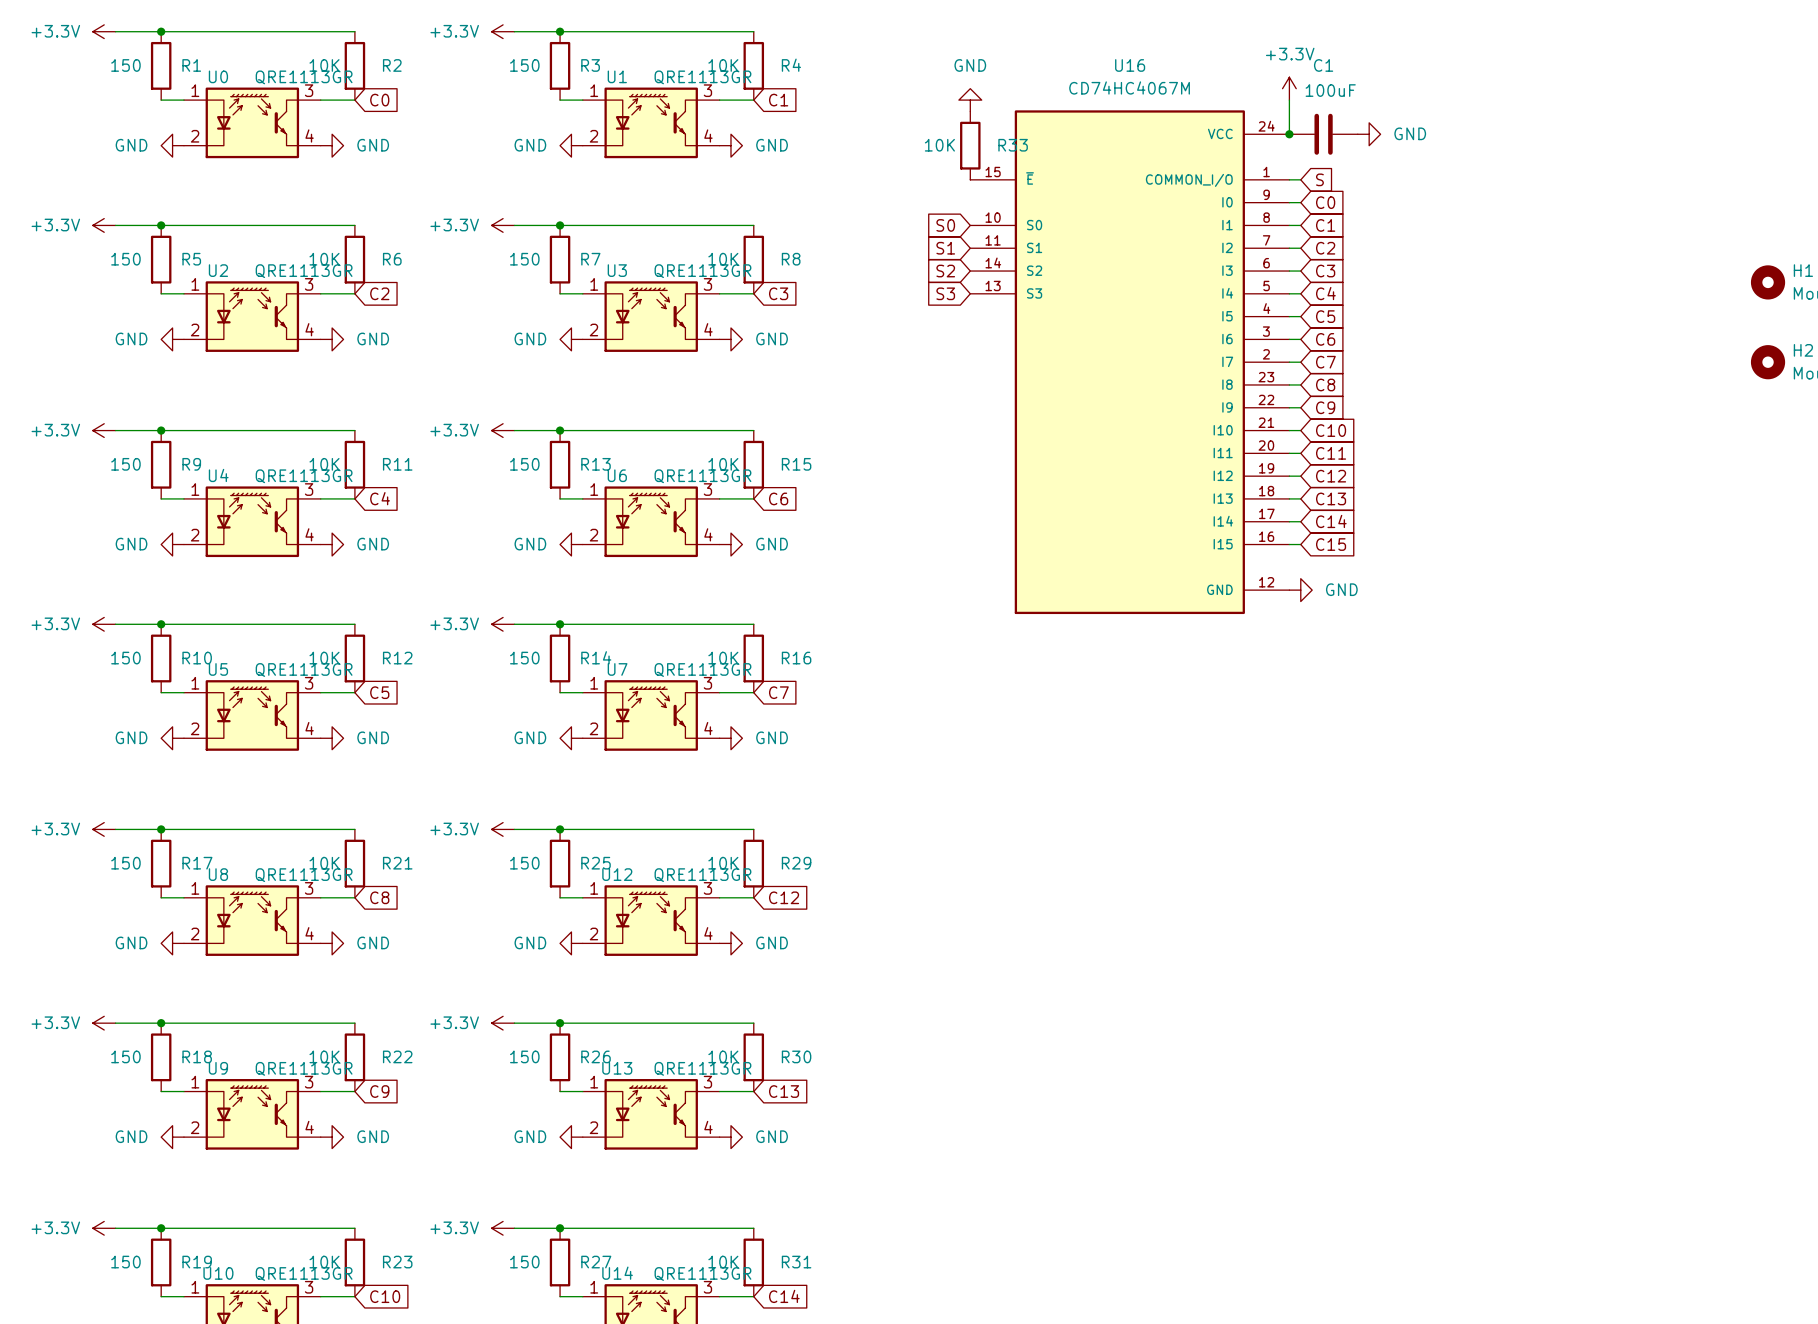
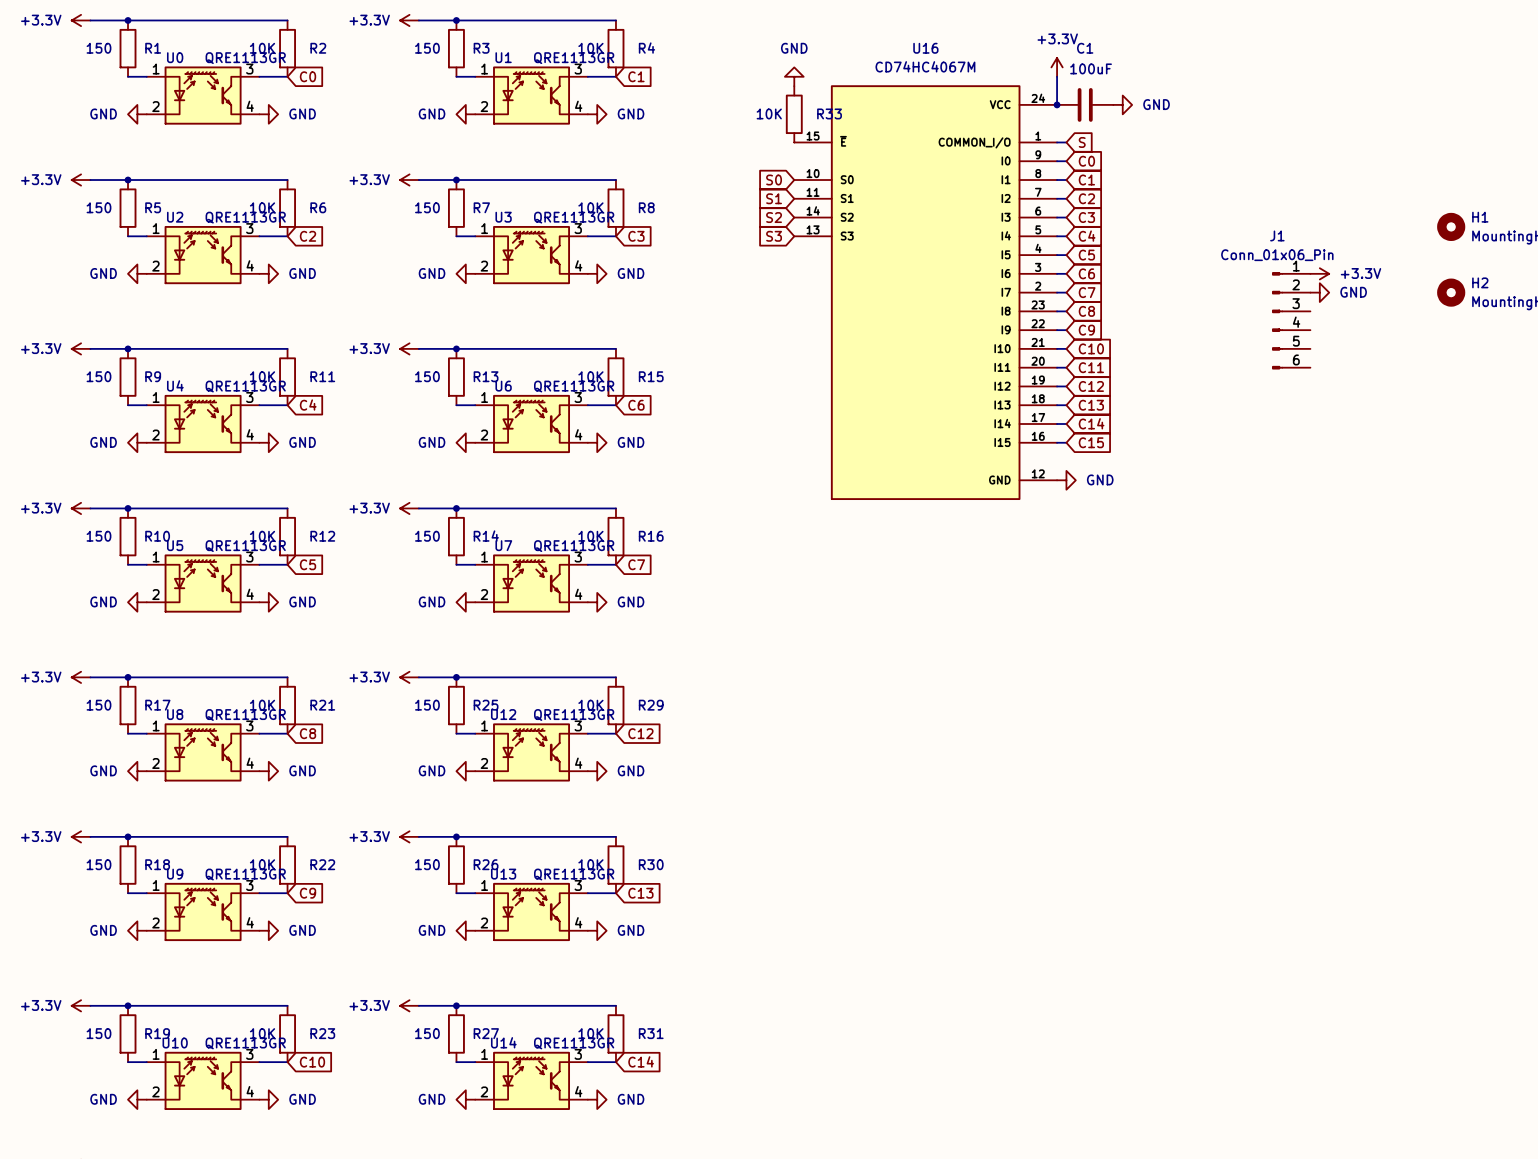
power symbol: none -> +3.3V (1319, 273)
power symbol: none -> GND (1319, 292)
J1: none -> Conn_01x06_Pin (1291, 320)

